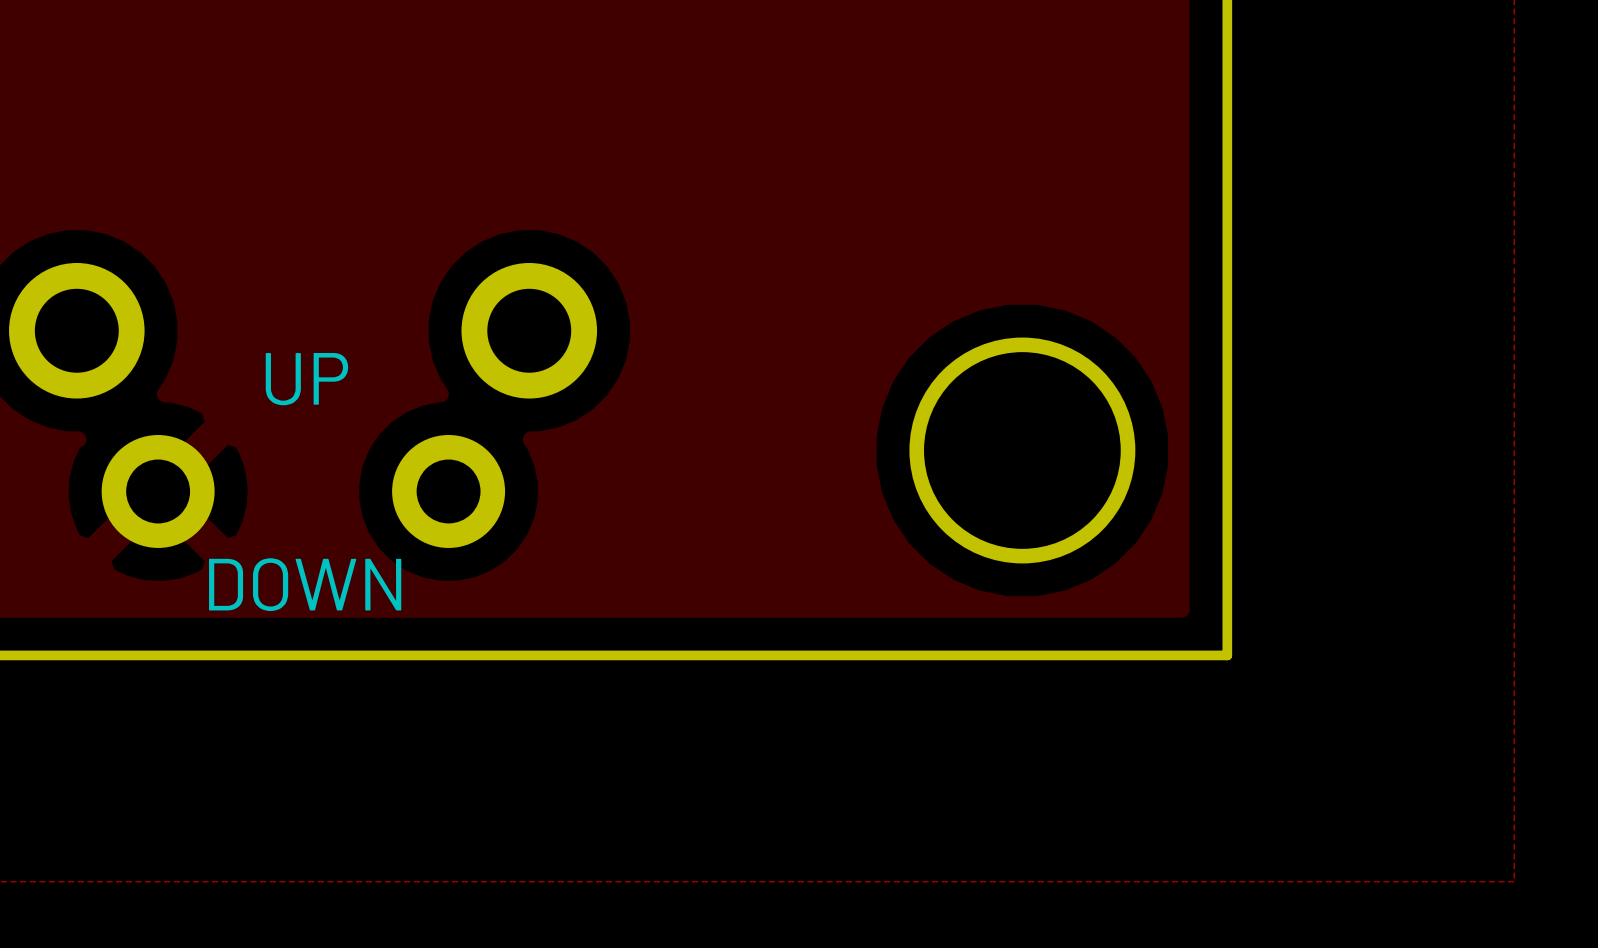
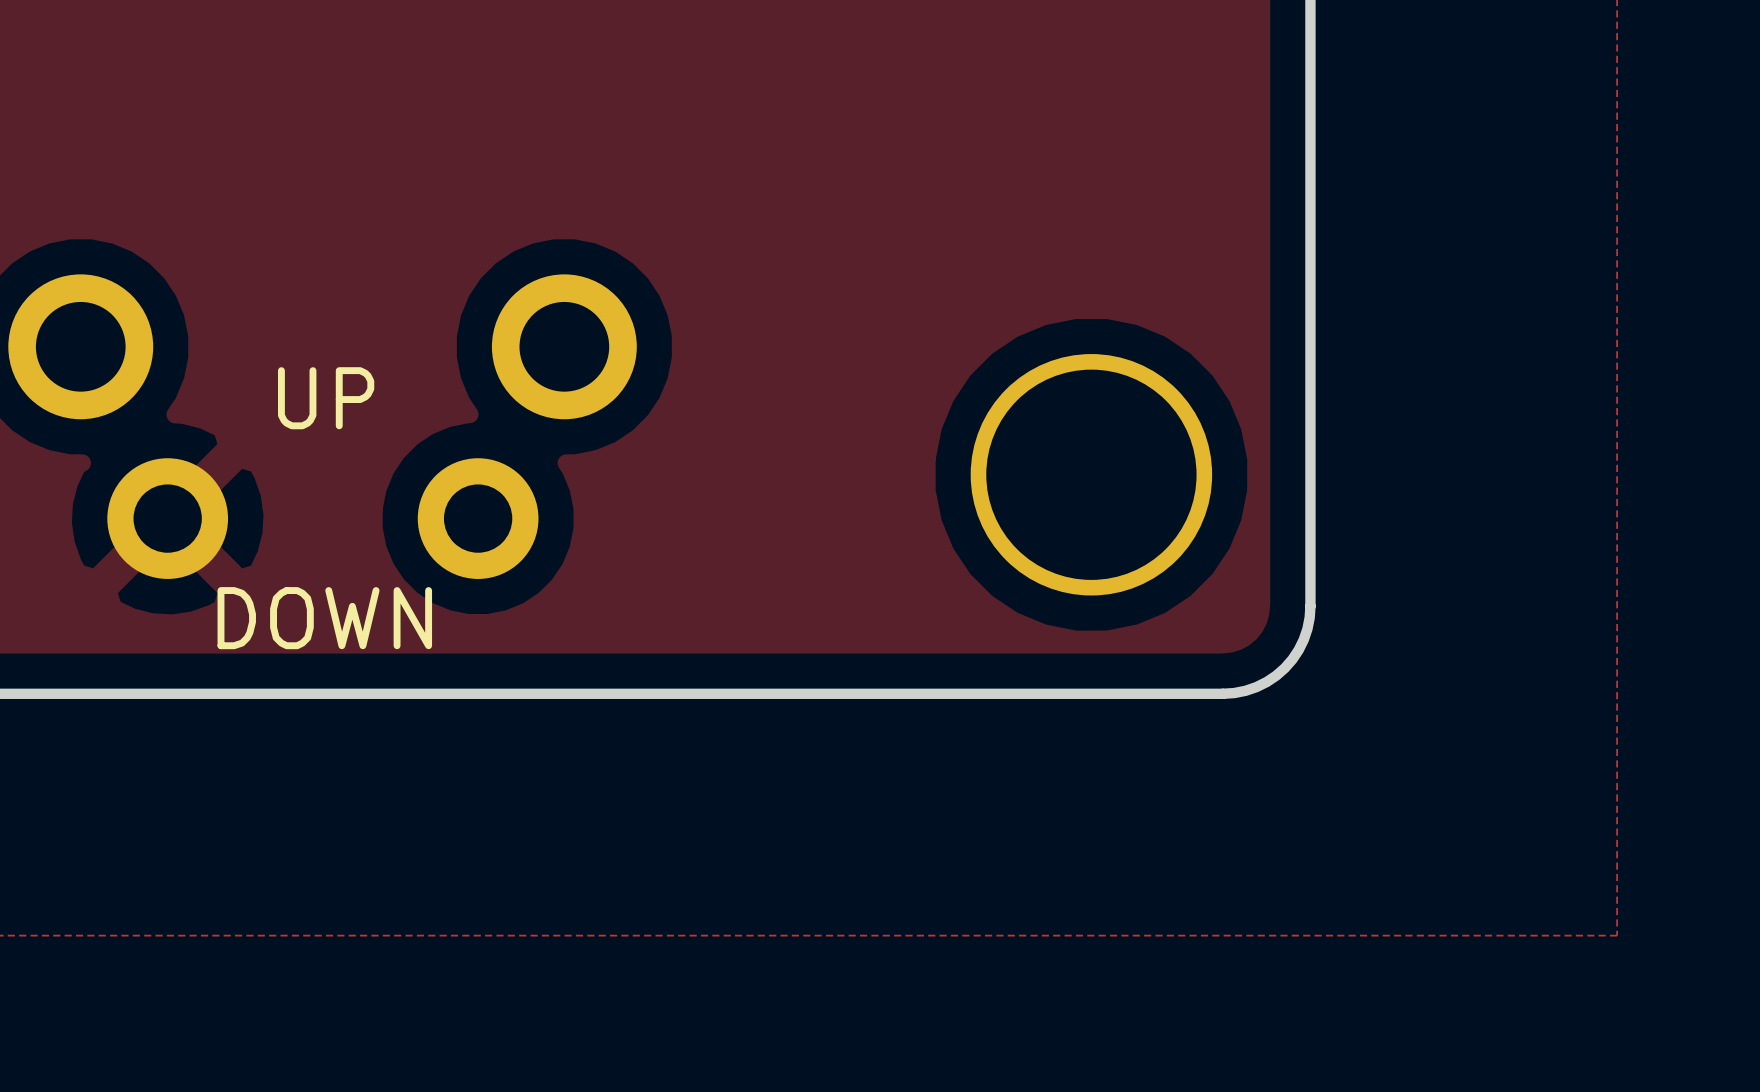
board edge: (1227, 573) (1227, 655) (1145, 655) -> (1310, 606) (1303, 639) (1284, 668) (1256, 687) (1222, 693)

